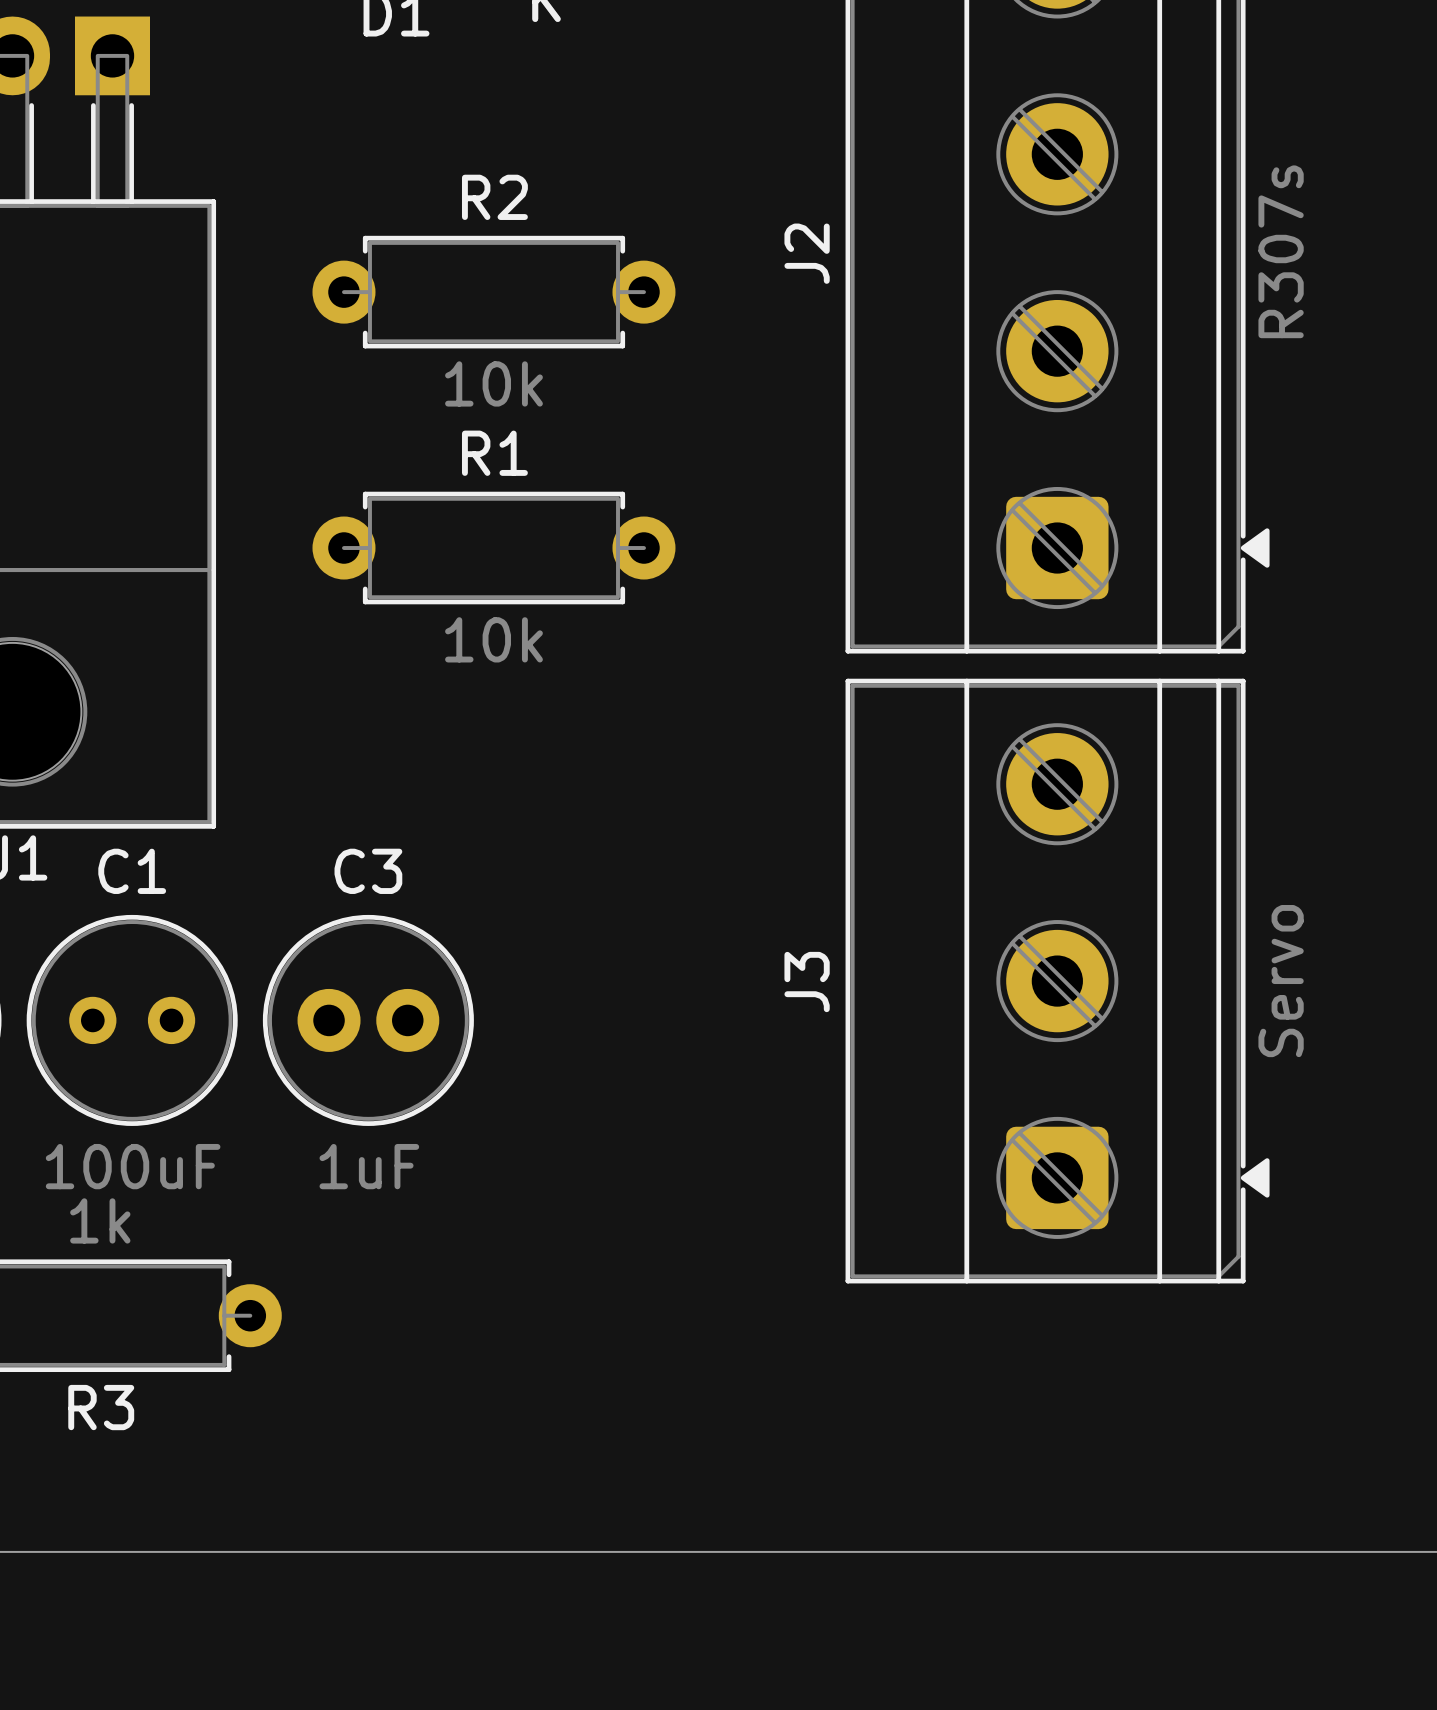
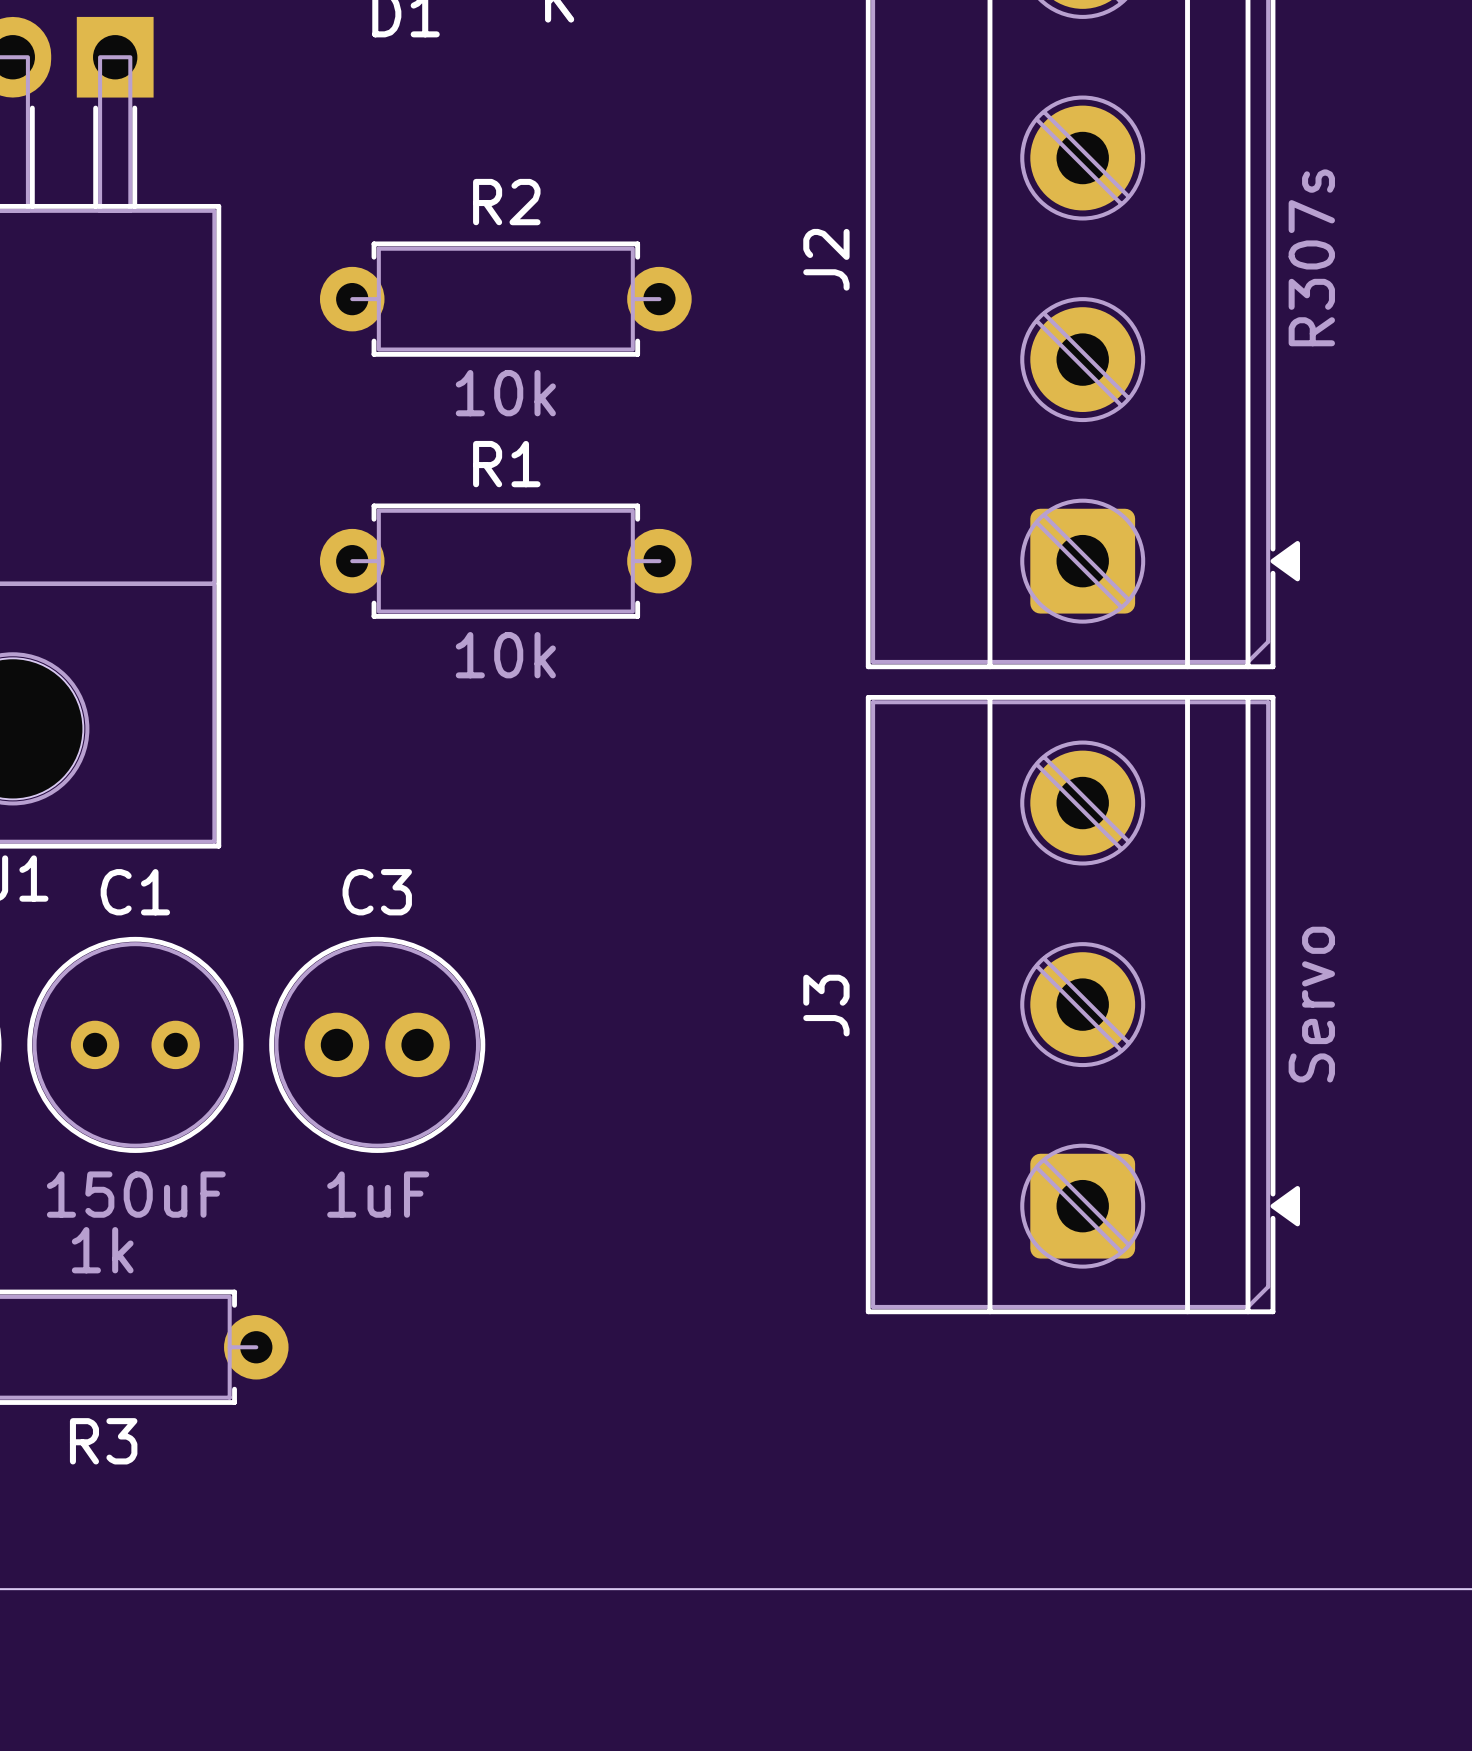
C1 value: 100uF (133, 1166) -> 150uF (136, 1194)

